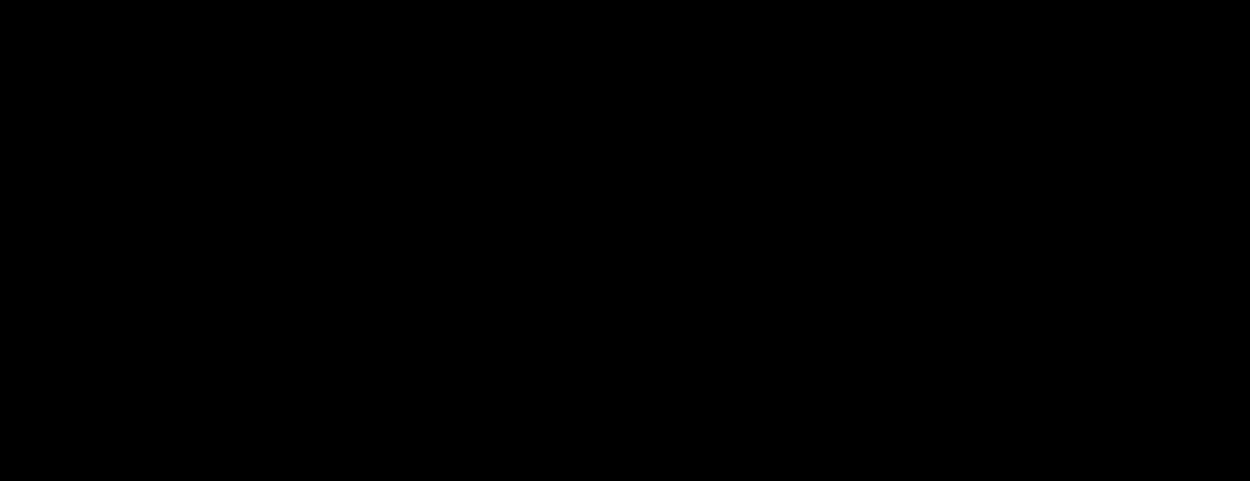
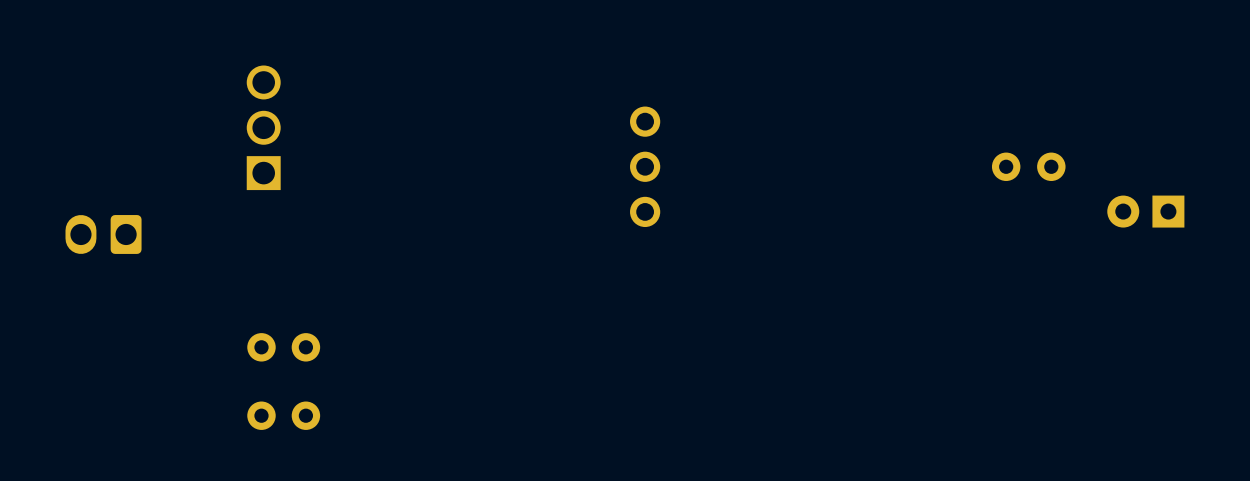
part: none -> (263, 127)
part: none -> (645, 166)
part: none -> (1028, 166)
part: none -> (1145, 211)
part: none -> (103, 234)
part: none -> (283, 347)
part: none -> (283, 415)

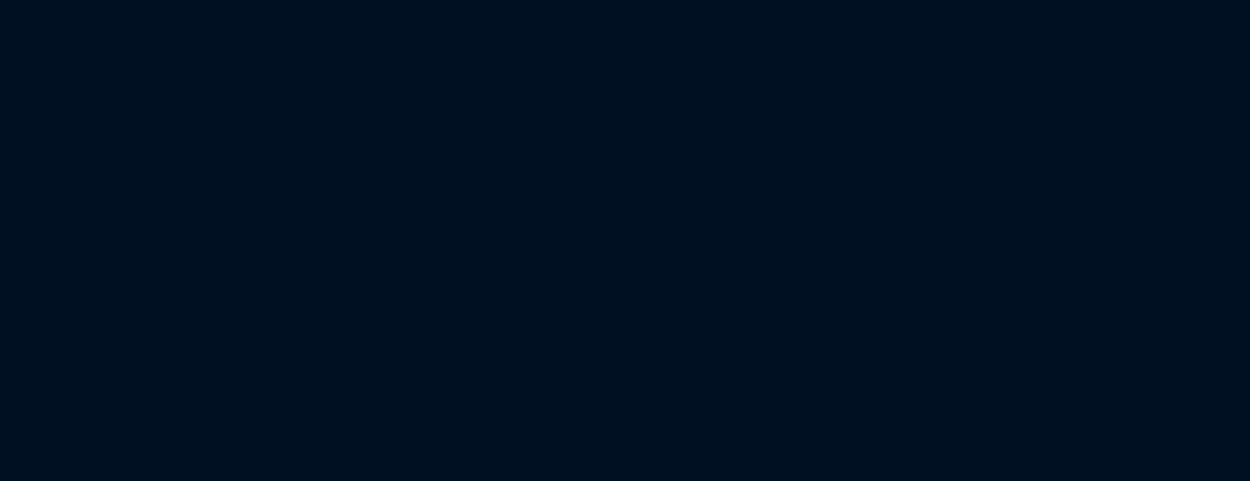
part: (263, 127) -> none
part: (645, 166) -> none
part: (1028, 166) -> none
part: (1145, 211) -> none
part: (103, 234) -> none
part: (283, 347) -> none
part: (283, 415) -> none

